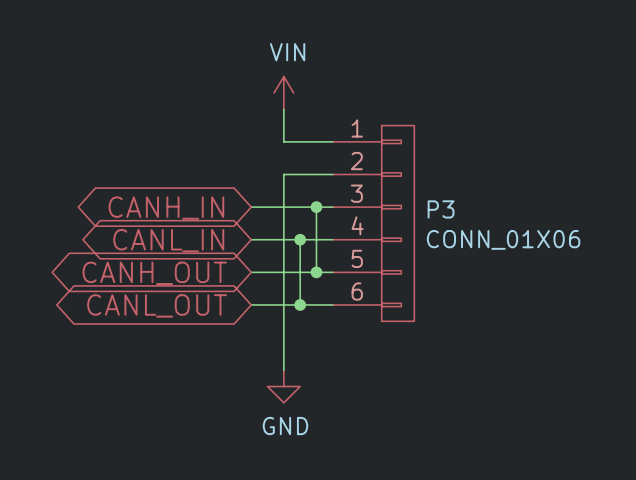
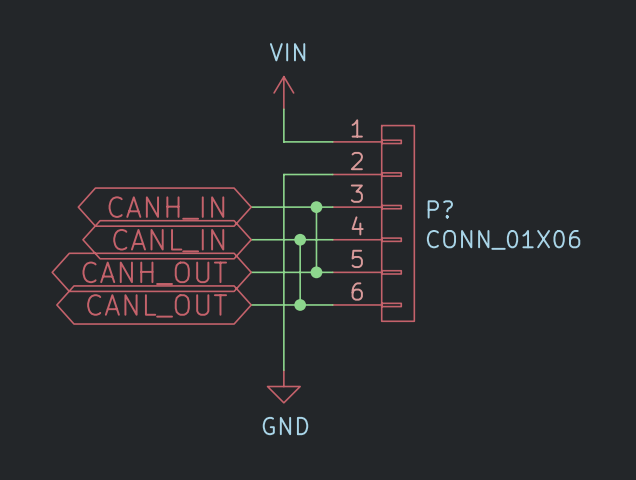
P3 name: P3 (441, 209) -> P? (440, 209)

